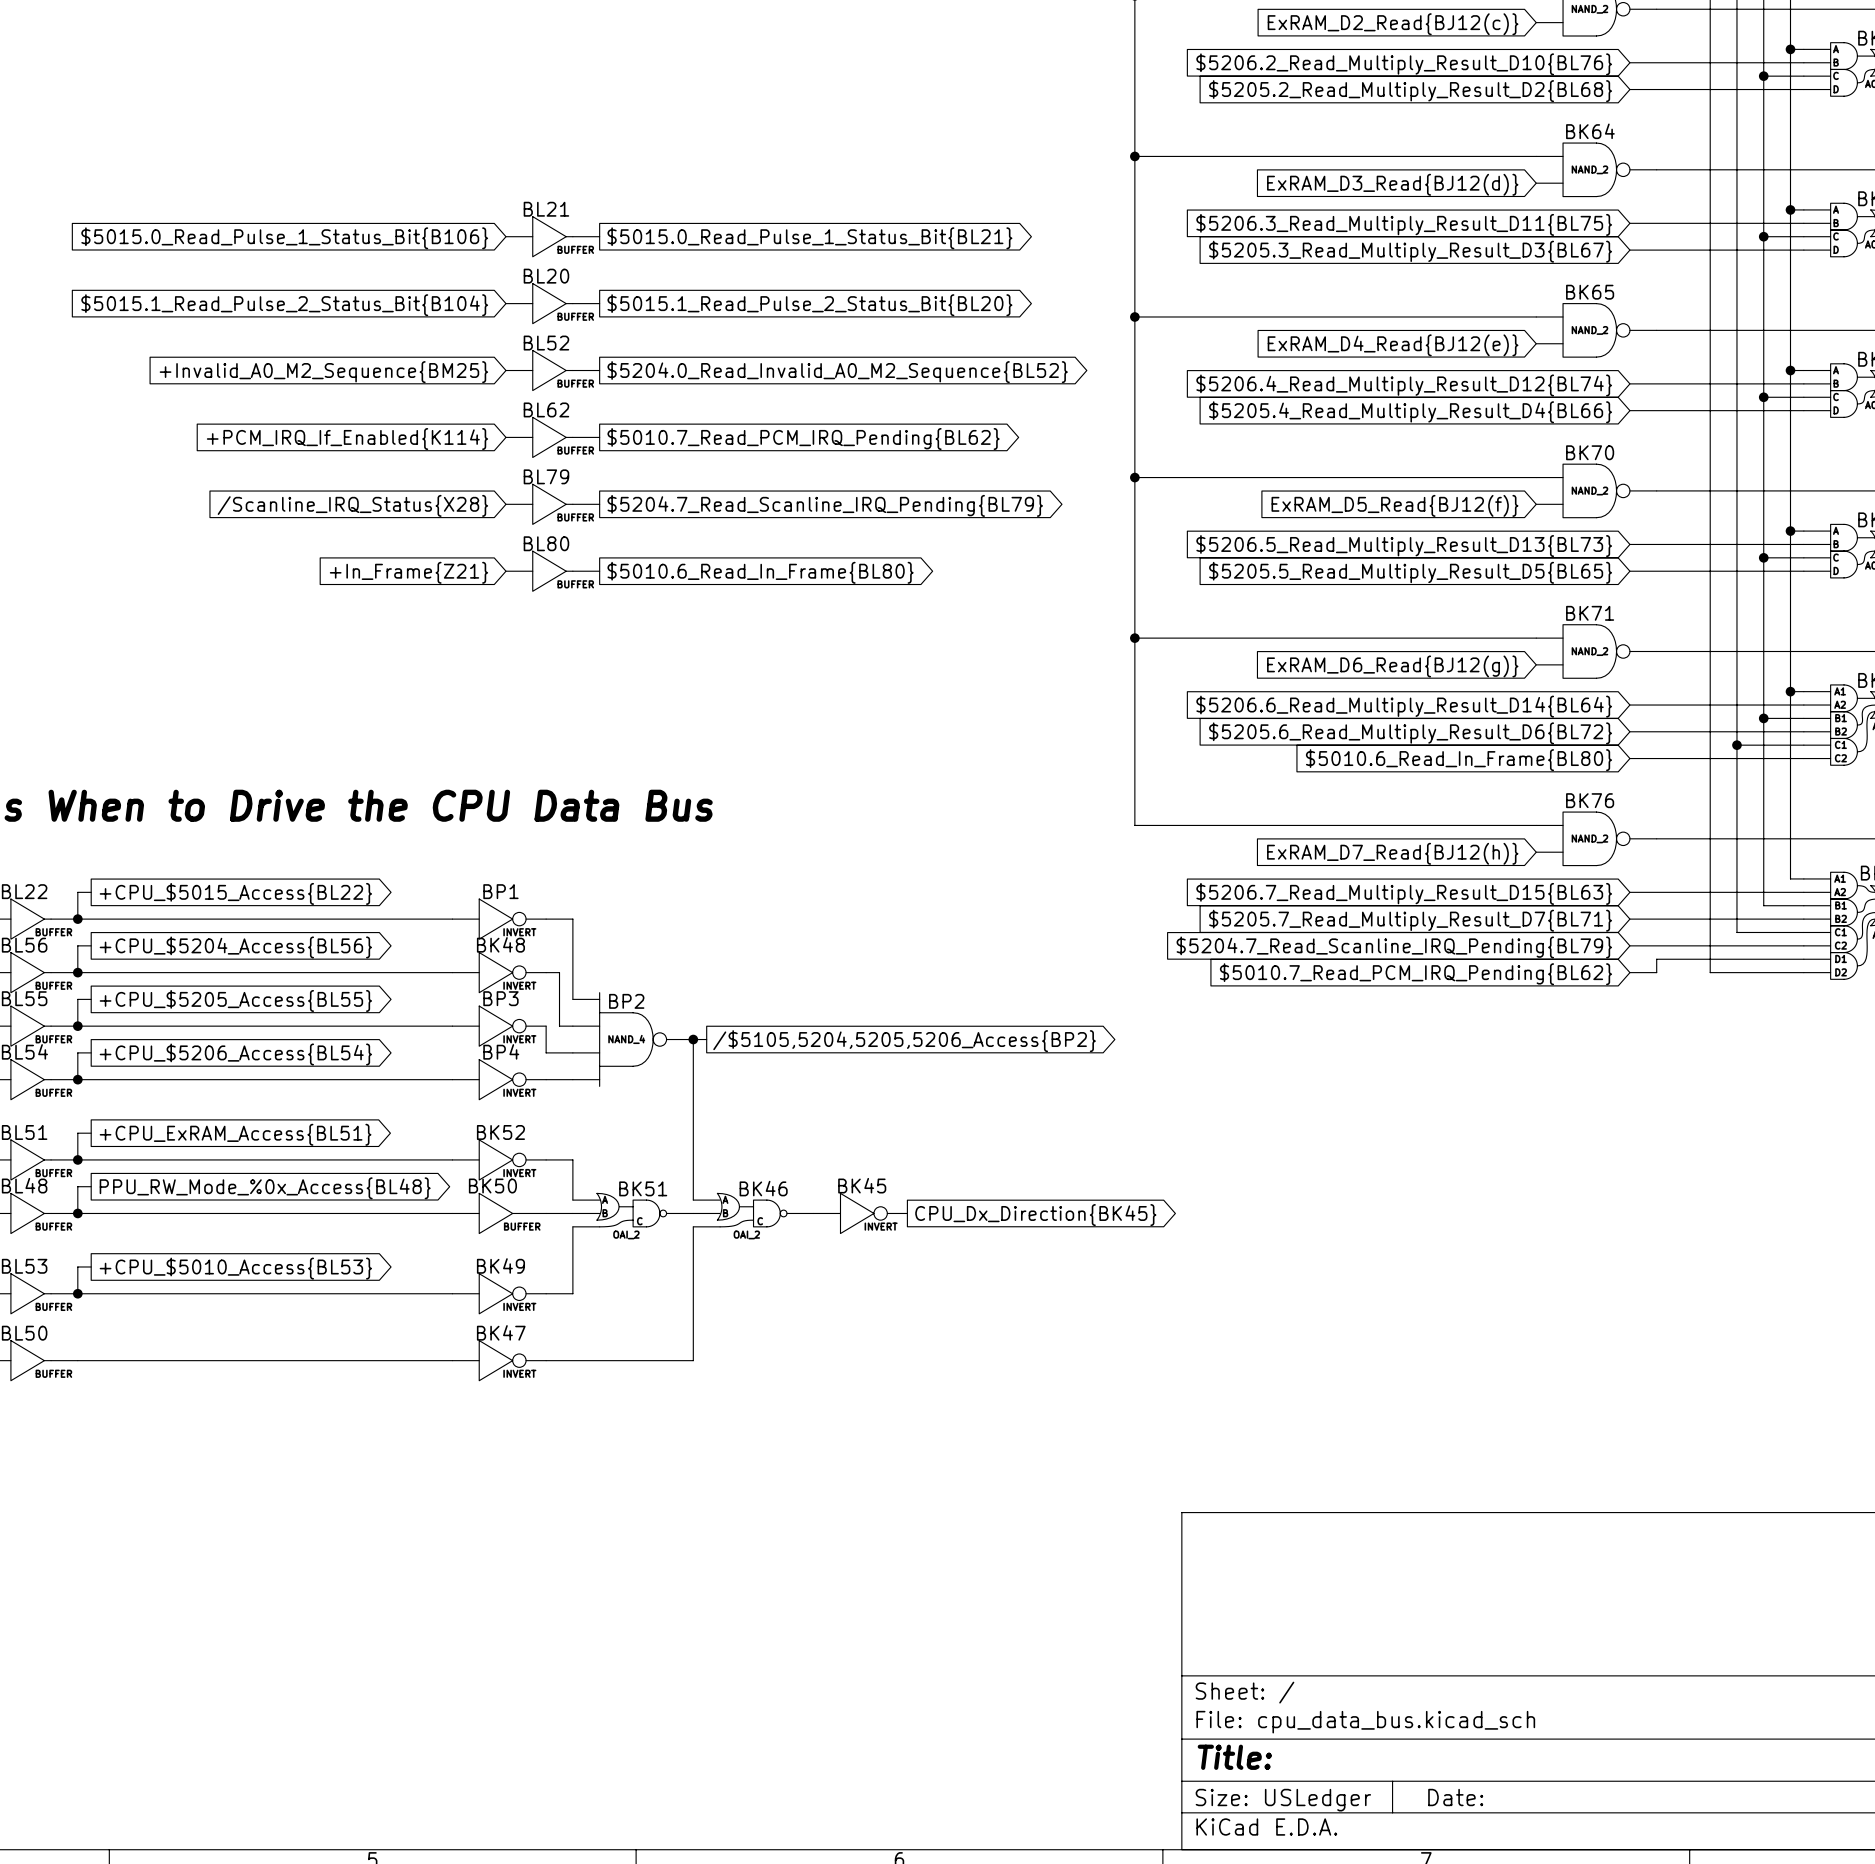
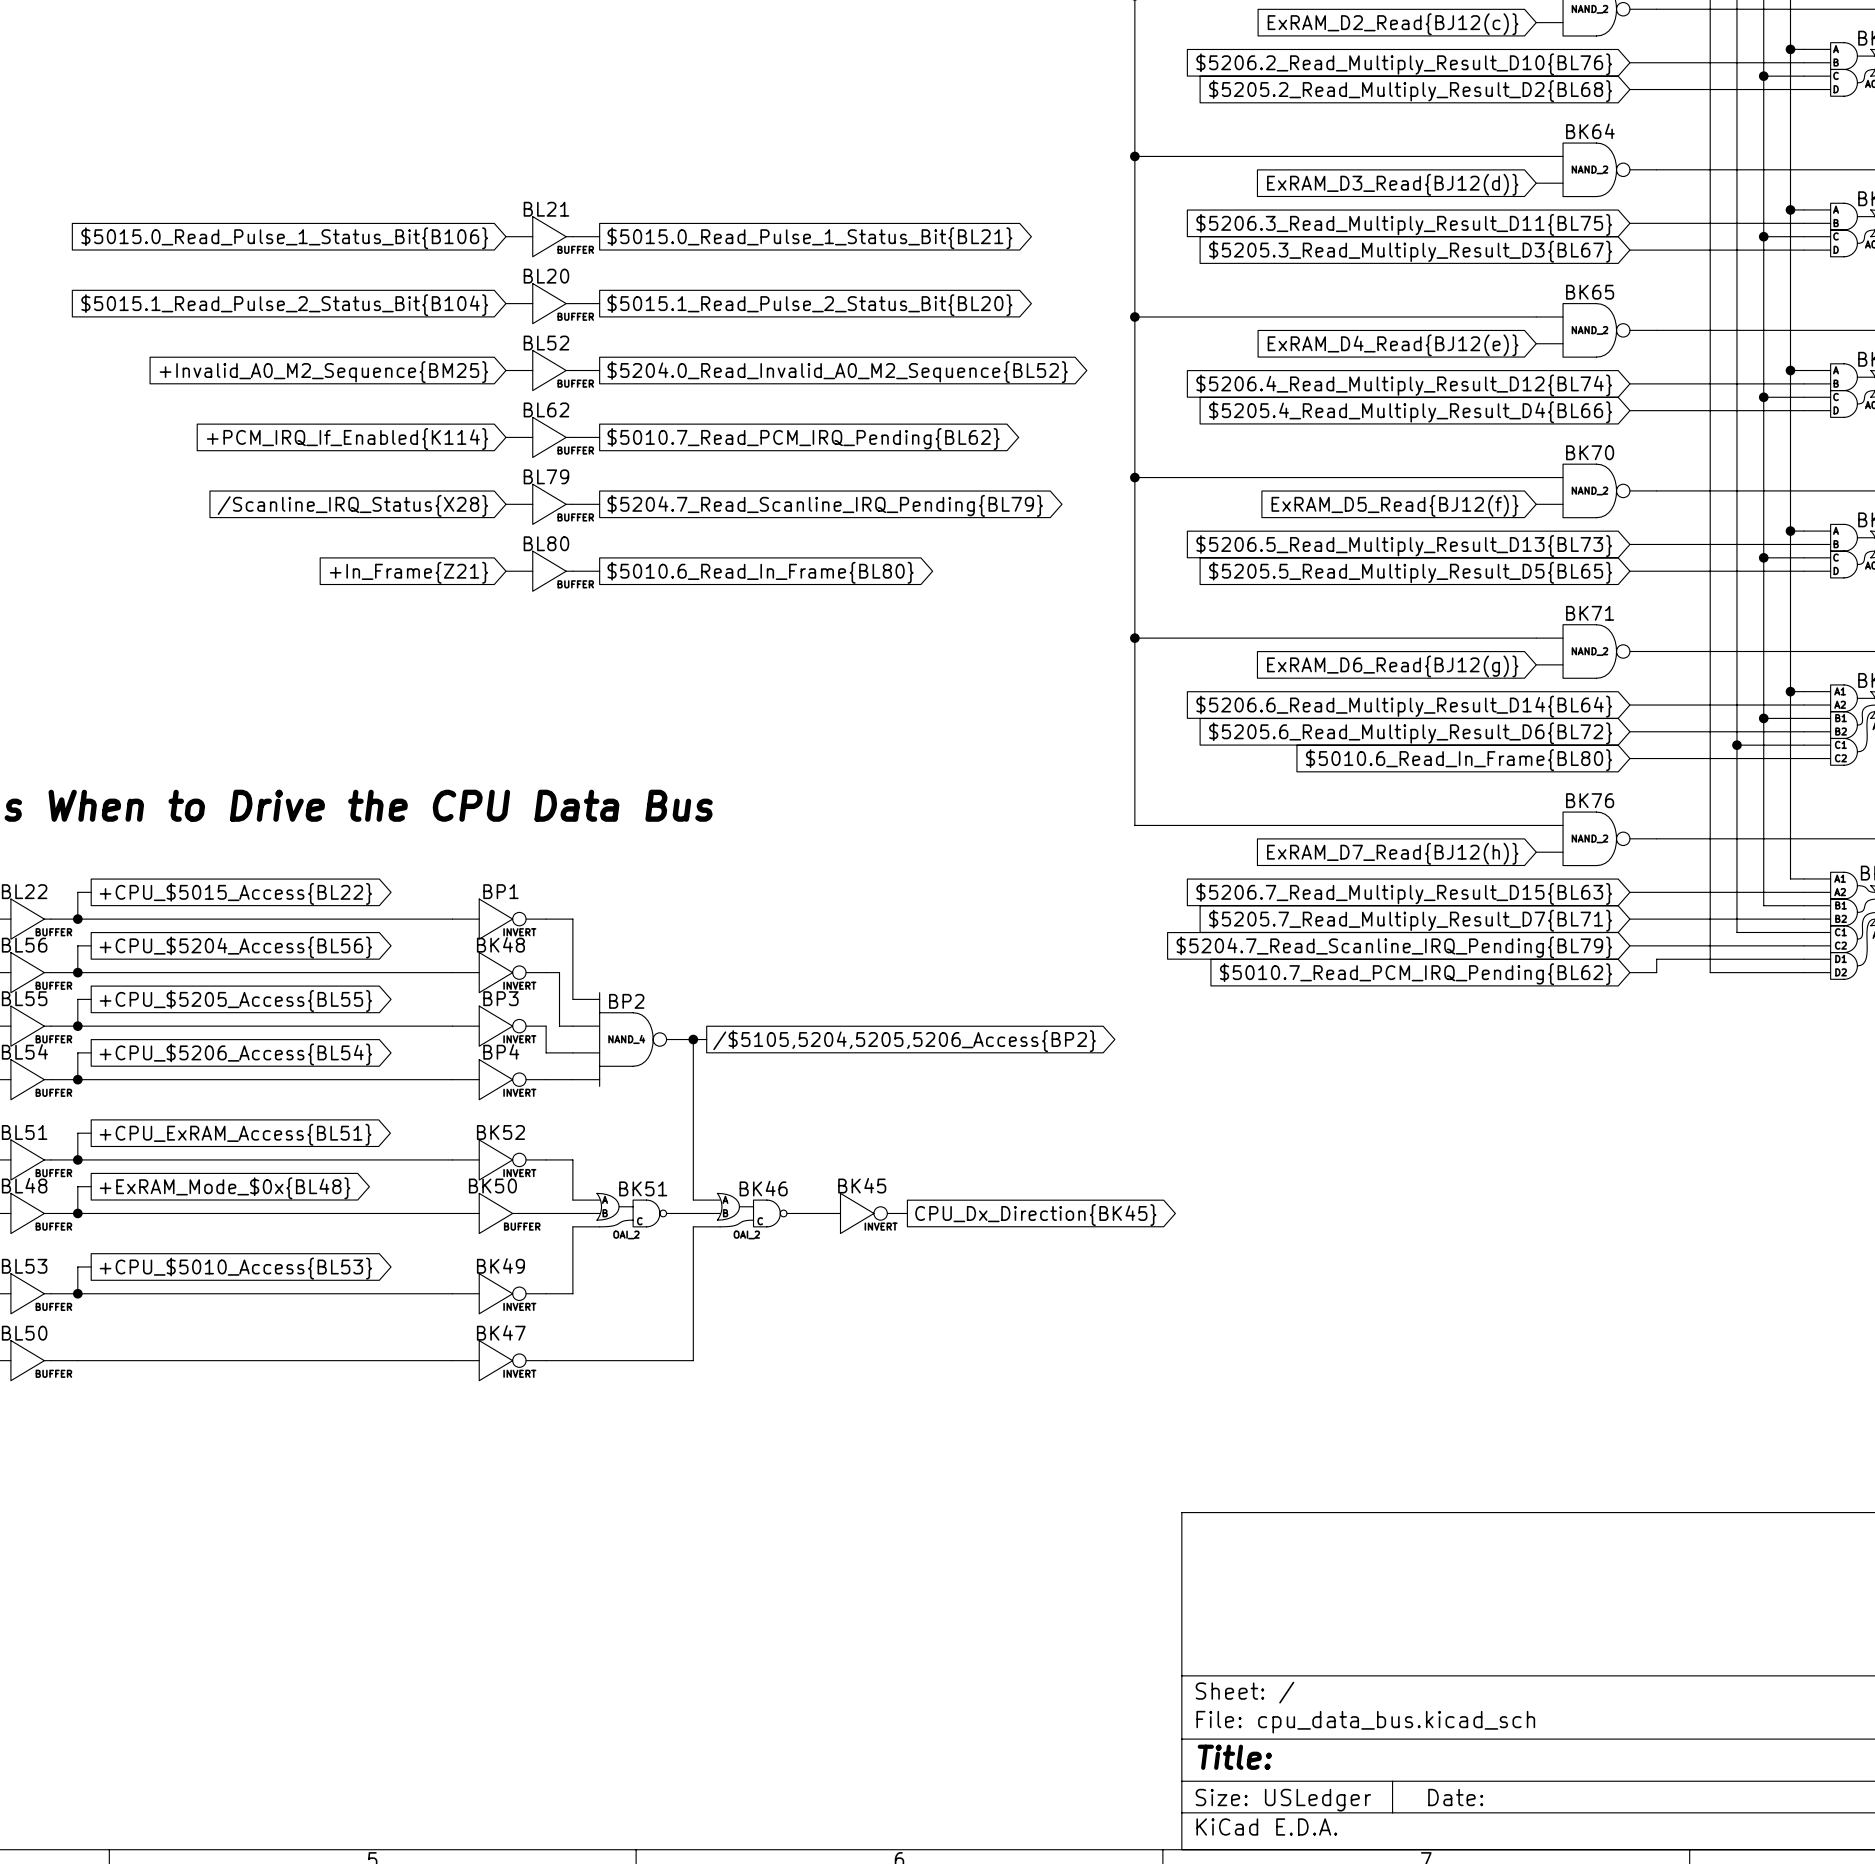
global label: PPU_RW_Mode_%0x_Access{BL48} (265, 1188) -> +ExRAM_Mode_$0x{BL48} (225, 1188)

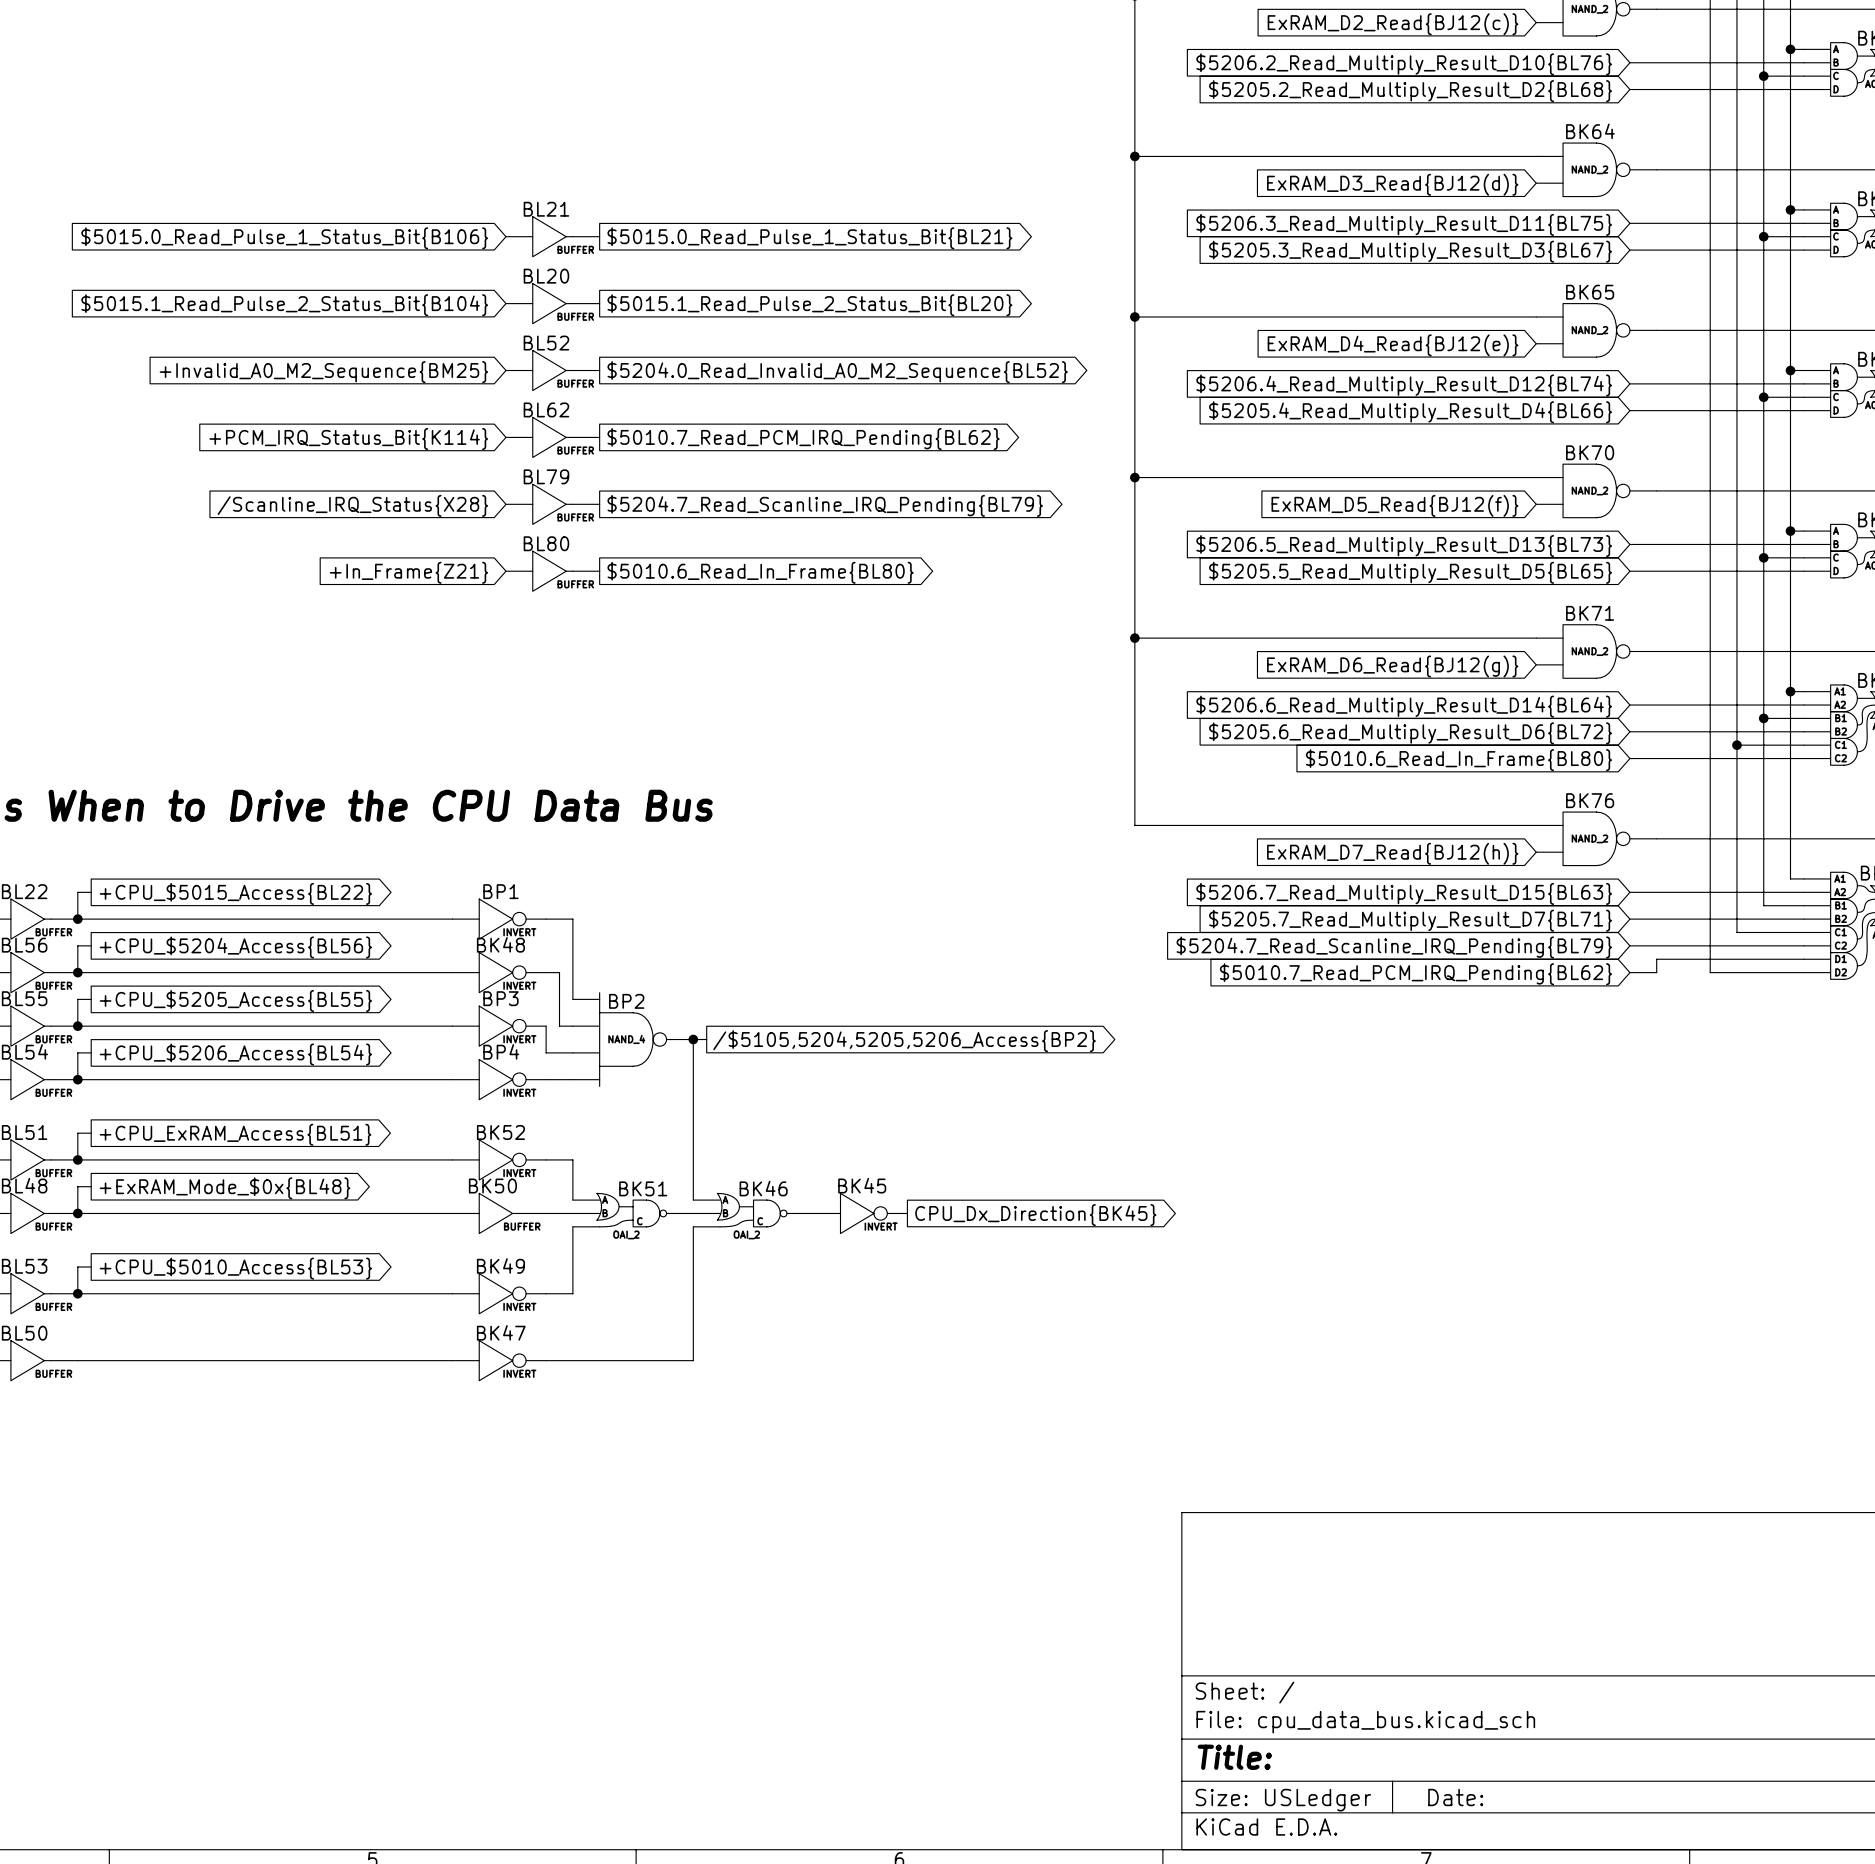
global label: +PCM_IRQ_If_Enabled{K114} (347, 439) -> +PCM_IRQ_Status_Bit{K114} (348, 439)

